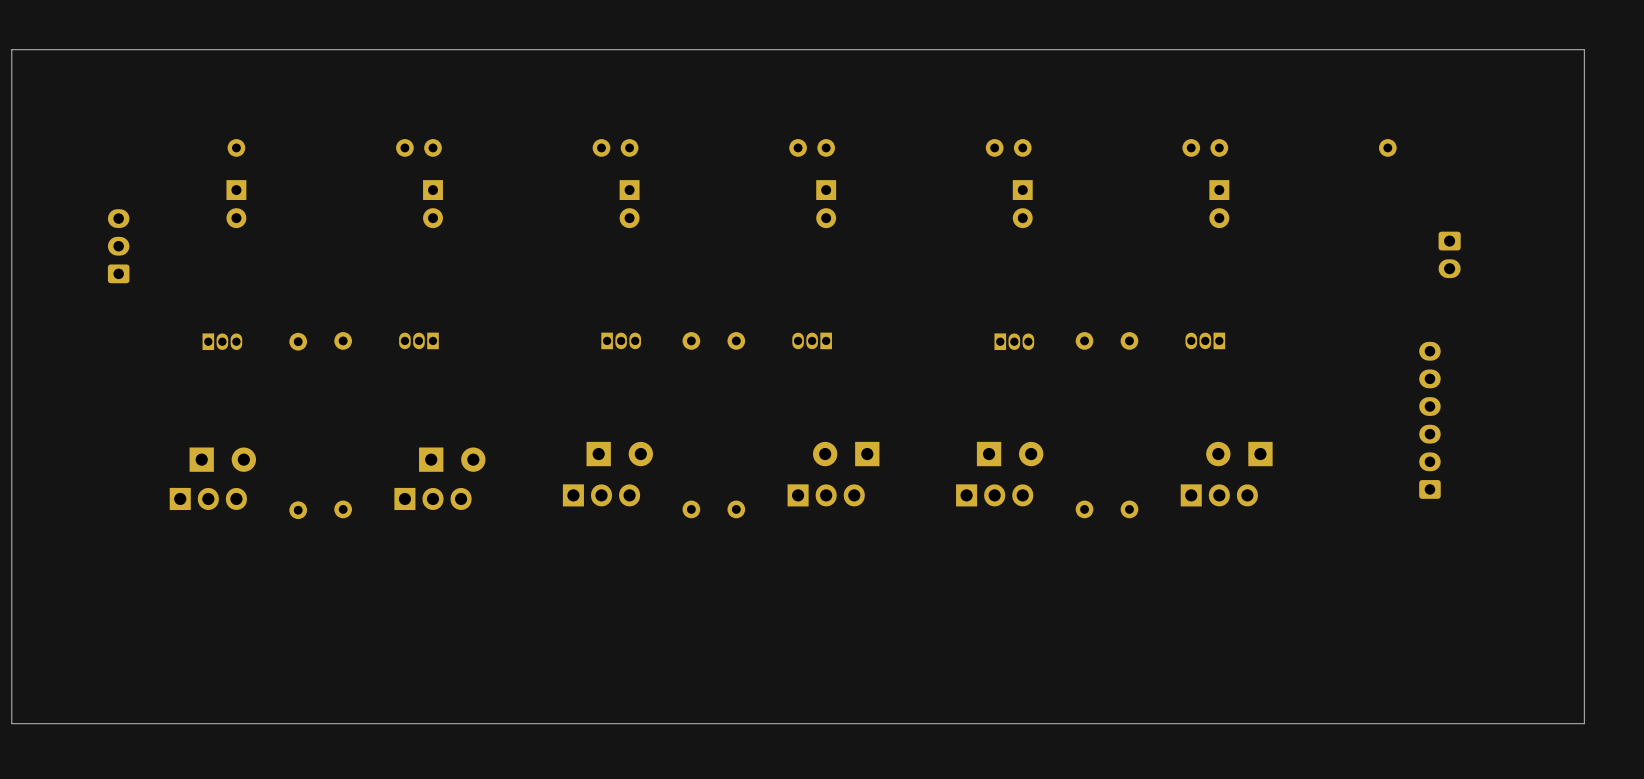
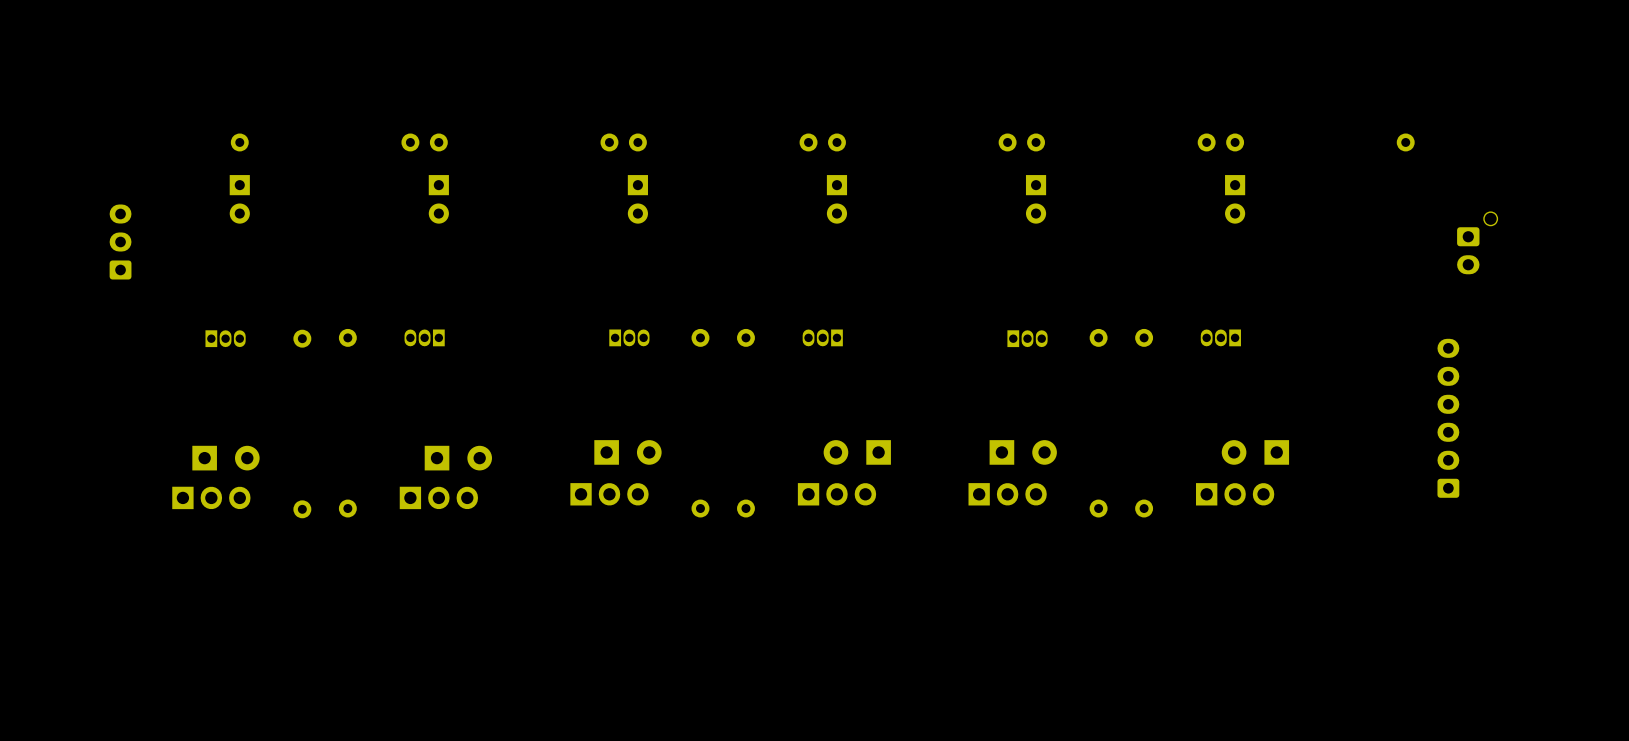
board edge: (1584, 49) (11, 49) (11, 723) (1584, 723) (1584, 49) -> none
part: none -> (1477, 243)

